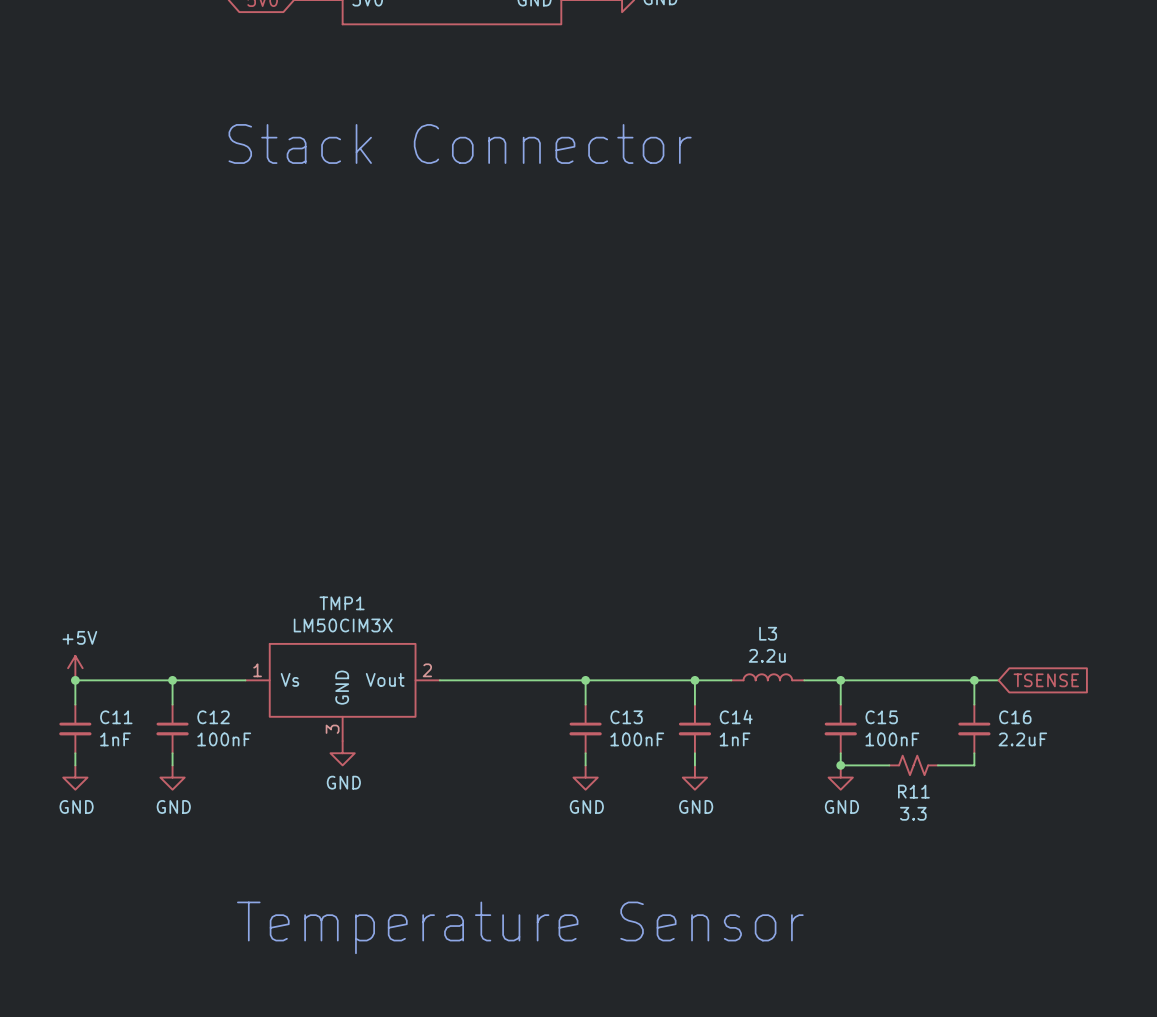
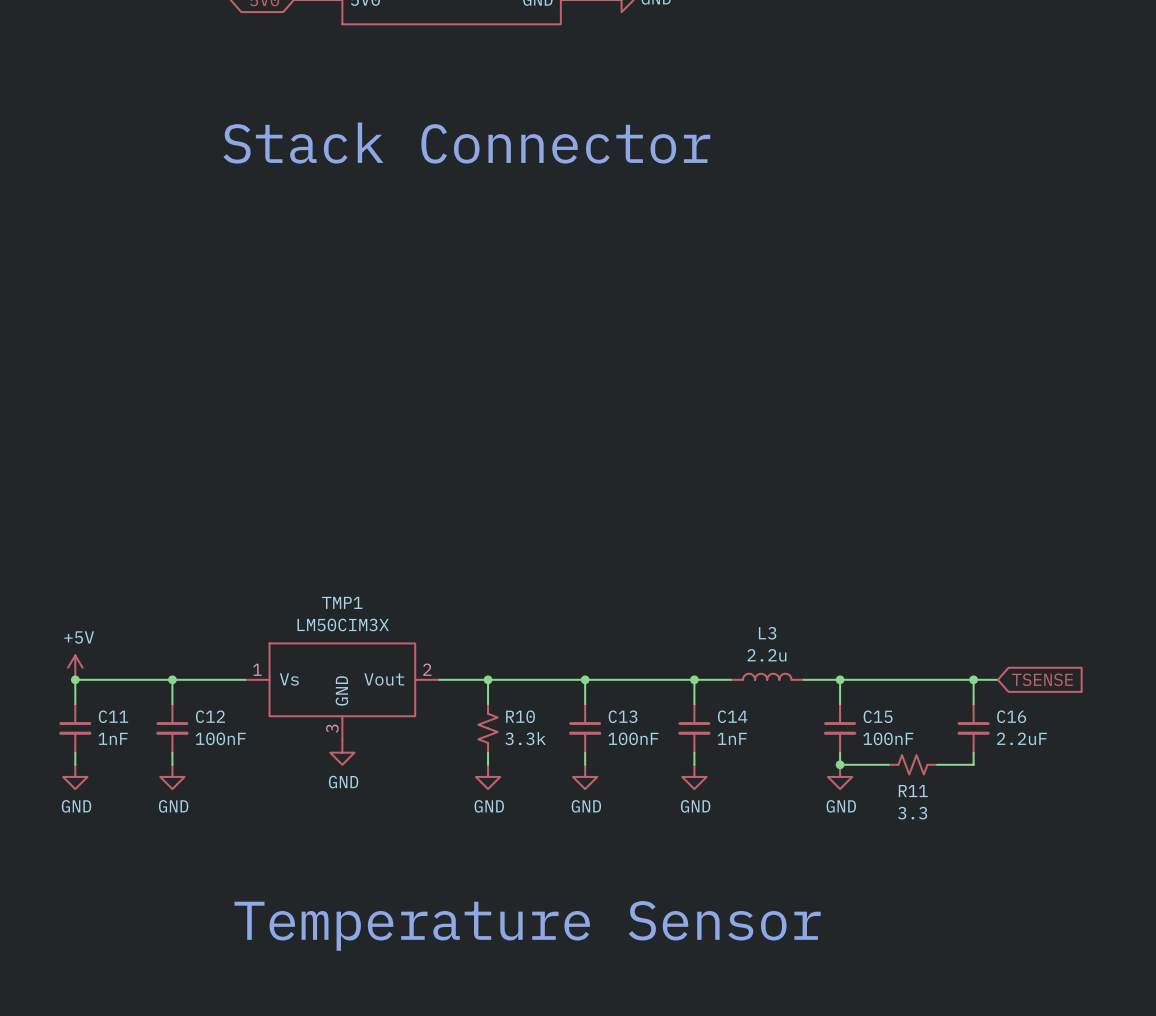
wire: none -> (488, 679) (488, 704)
junction: none -> (488, 679)
R10: none -> 3.3k (488, 728)
wire: none -> (488, 752) (488, 764)
power symbol: none -> GND (488, 776)

